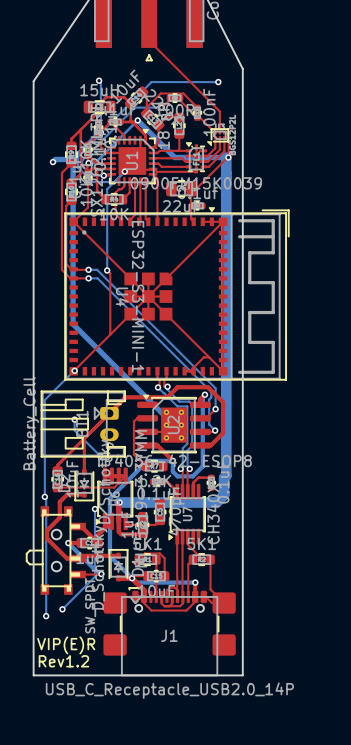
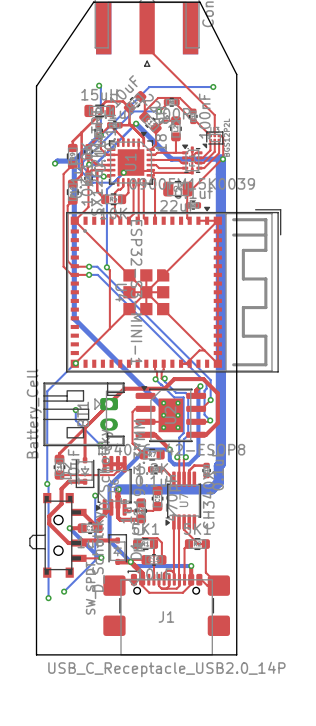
text: VIP(E)R (66, 645) -> none
text: Rev1.2 (63, 661) -> none

